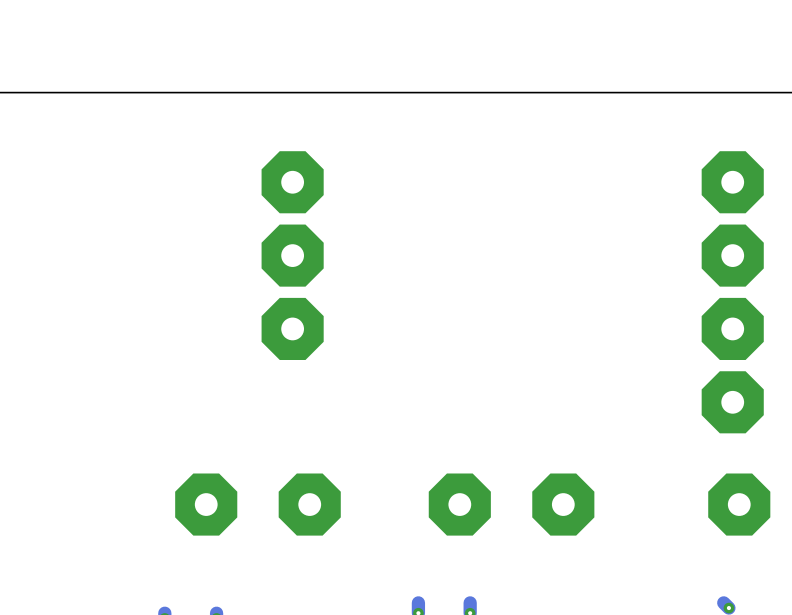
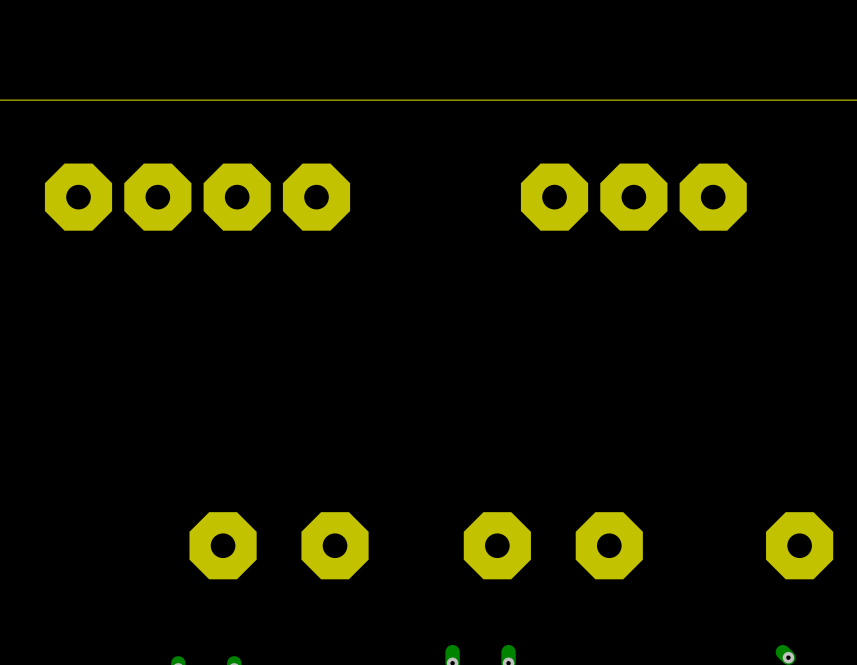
part: none -> (78, 197)
part: none -> (157, 197)
part: none -> (237, 197)
part: none -> (554, 197)
part: none -> (633, 197)
part: none -> (713, 197)
part: (732, 182) -> none
part: (292, 255) -> none
part: (732, 255) -> none
part: (292, 328) -> none
part: (732, 328) -> none
part: (732, 402) -> none

